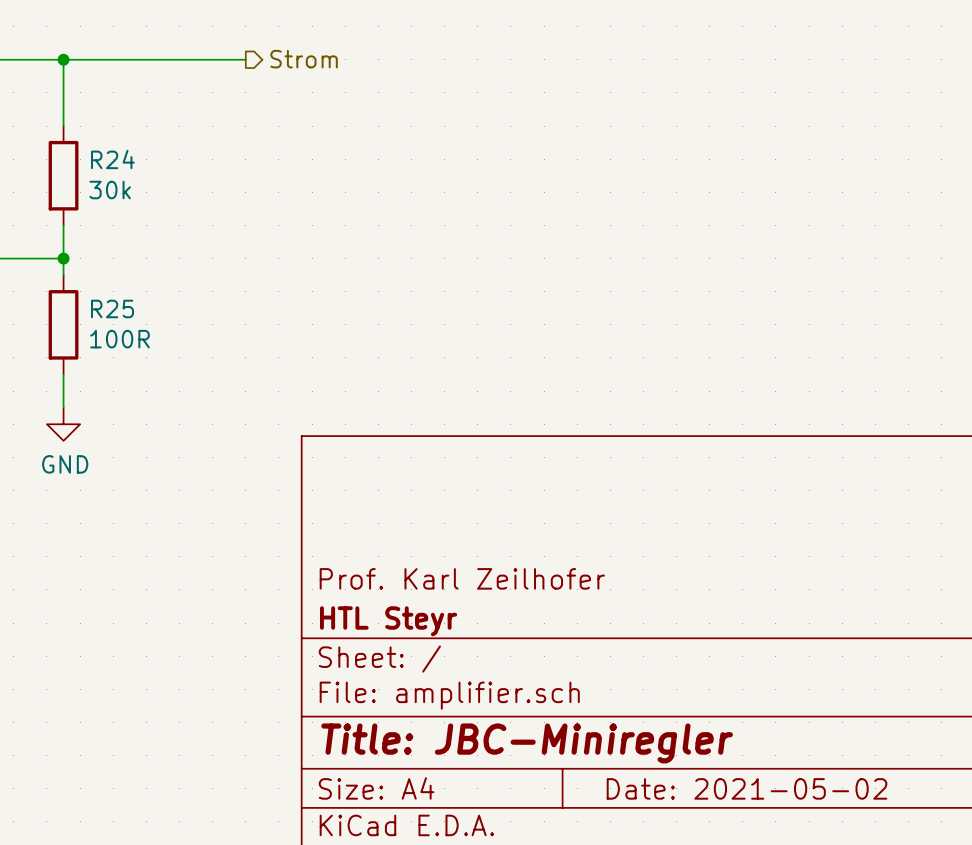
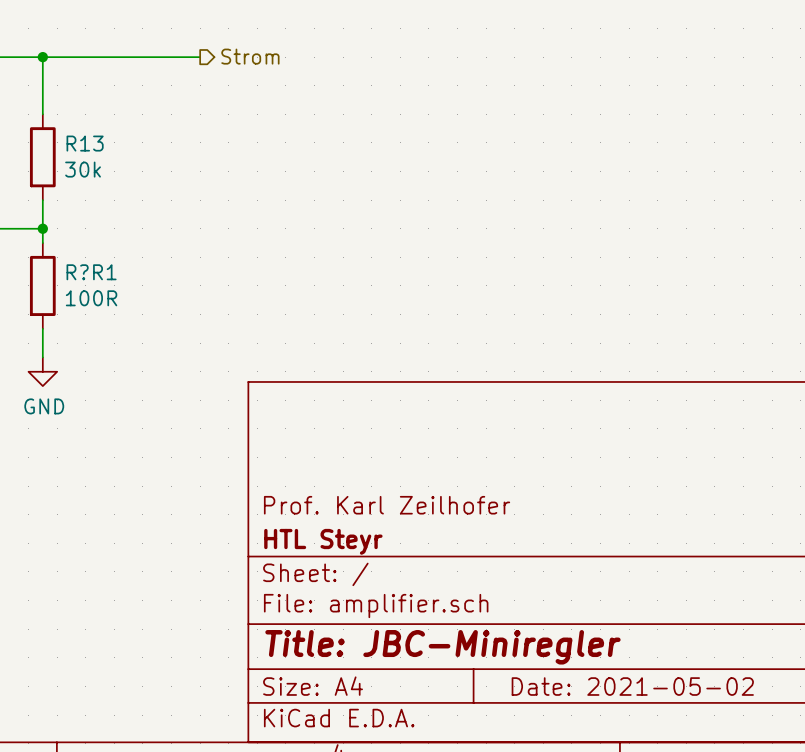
R24 name: R24 (112, 159) -> R13 (85, 143)
R25 name: R25 (112, 308) -> R?R1 (91, 272)

